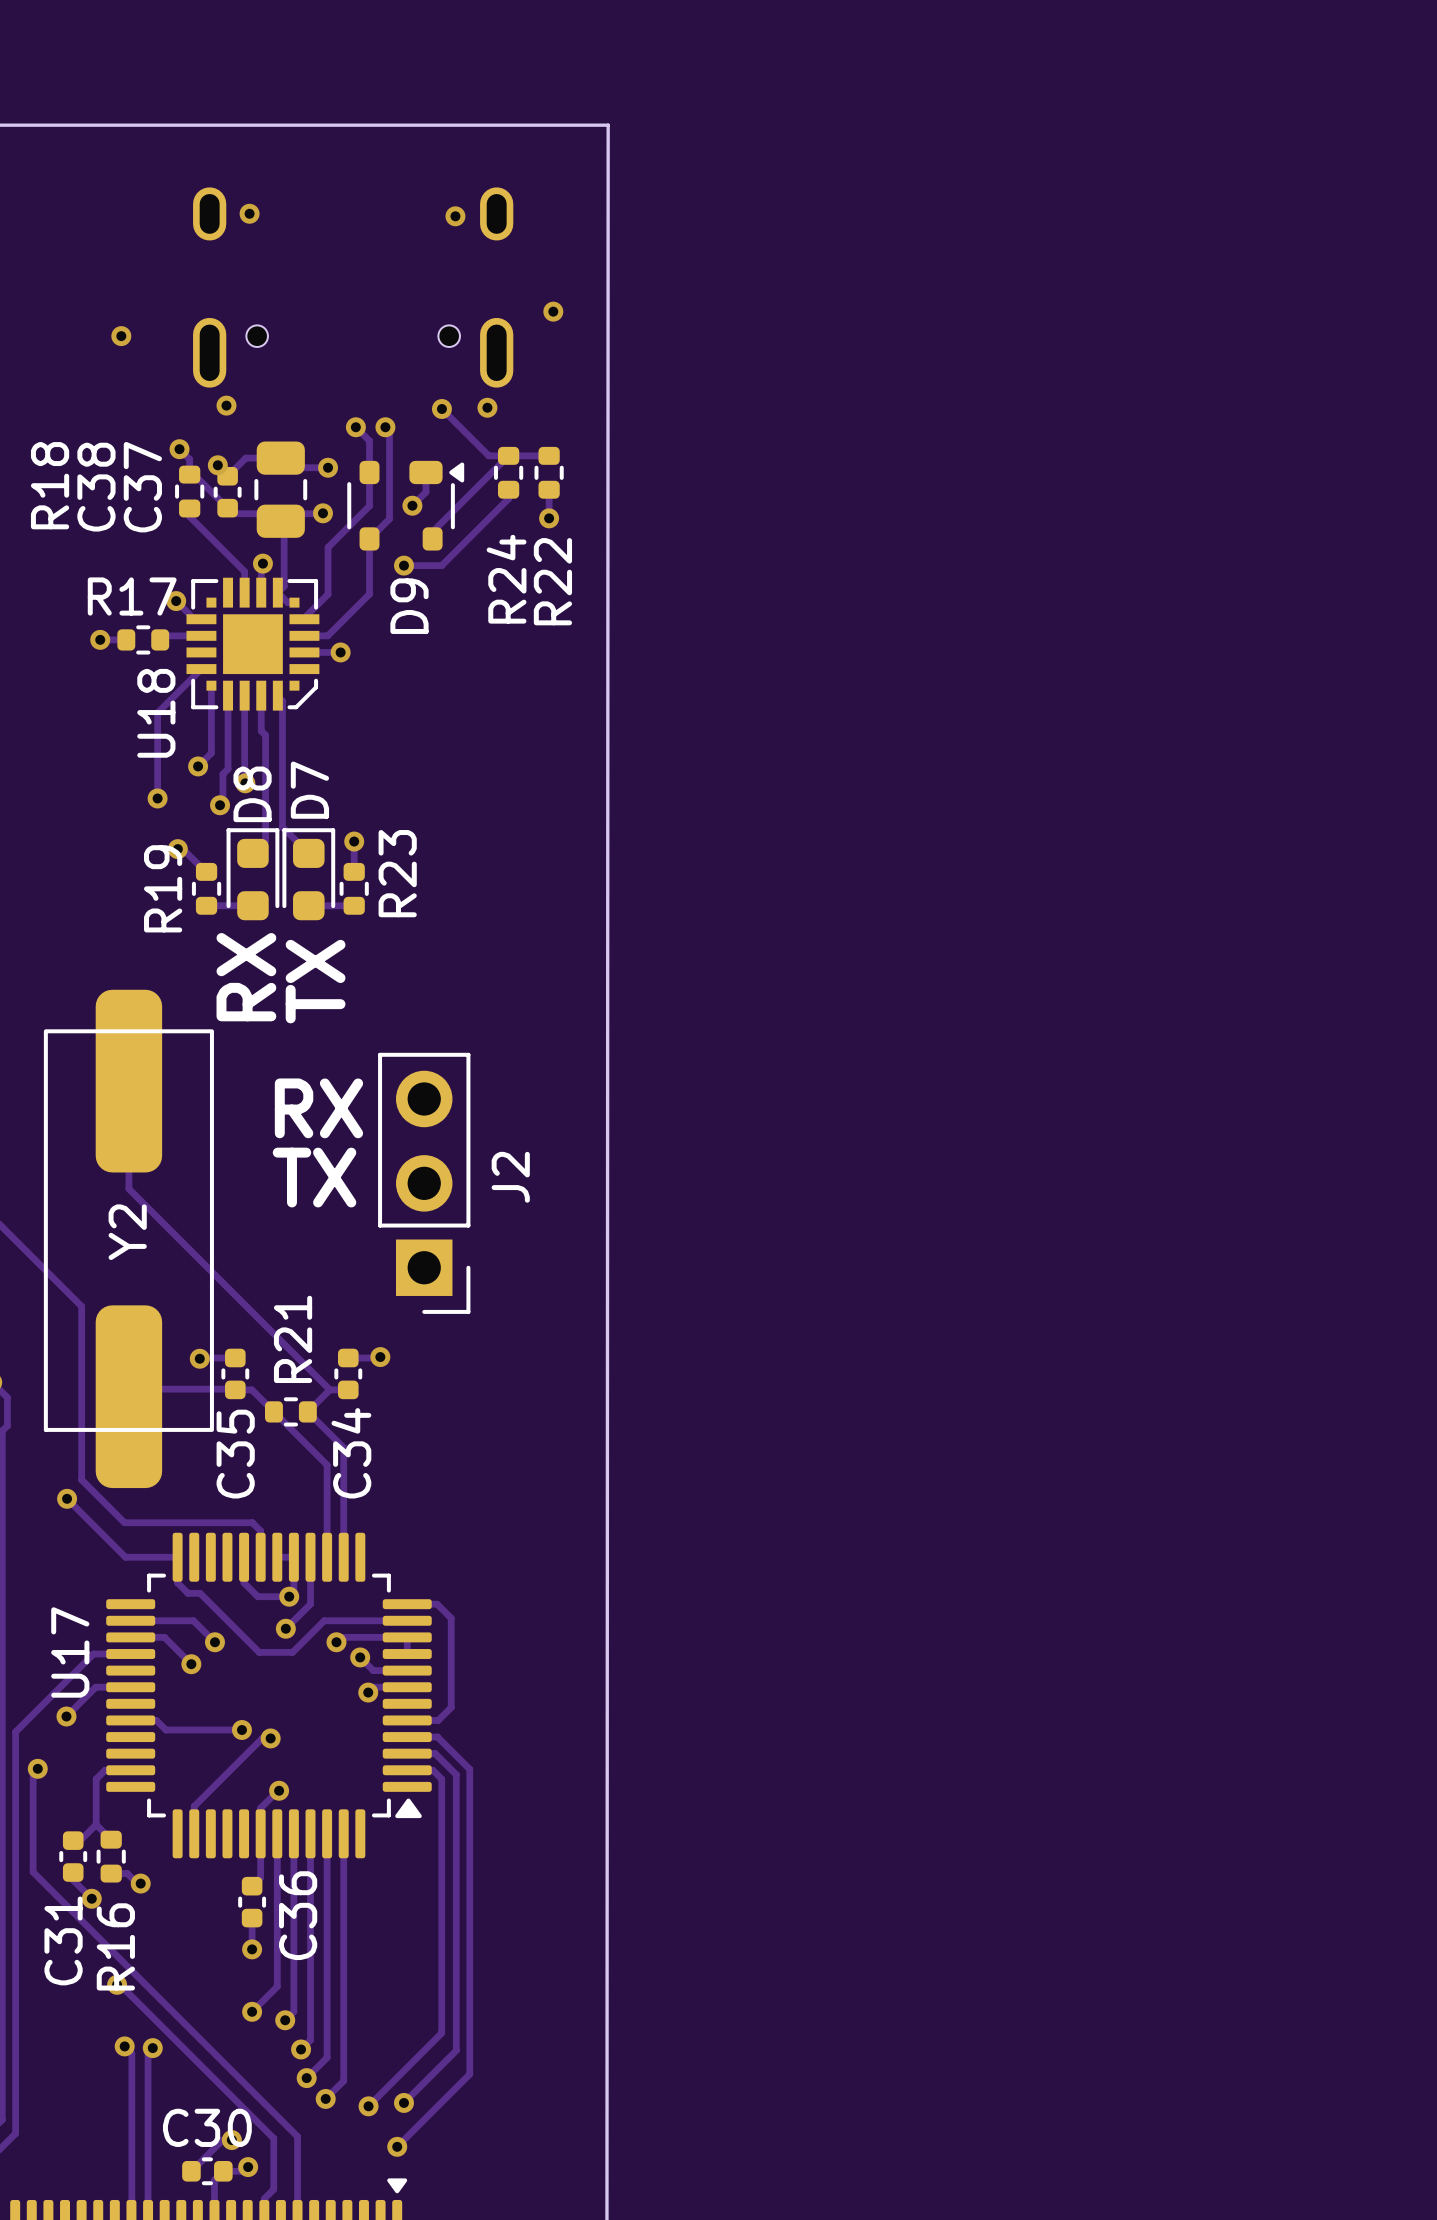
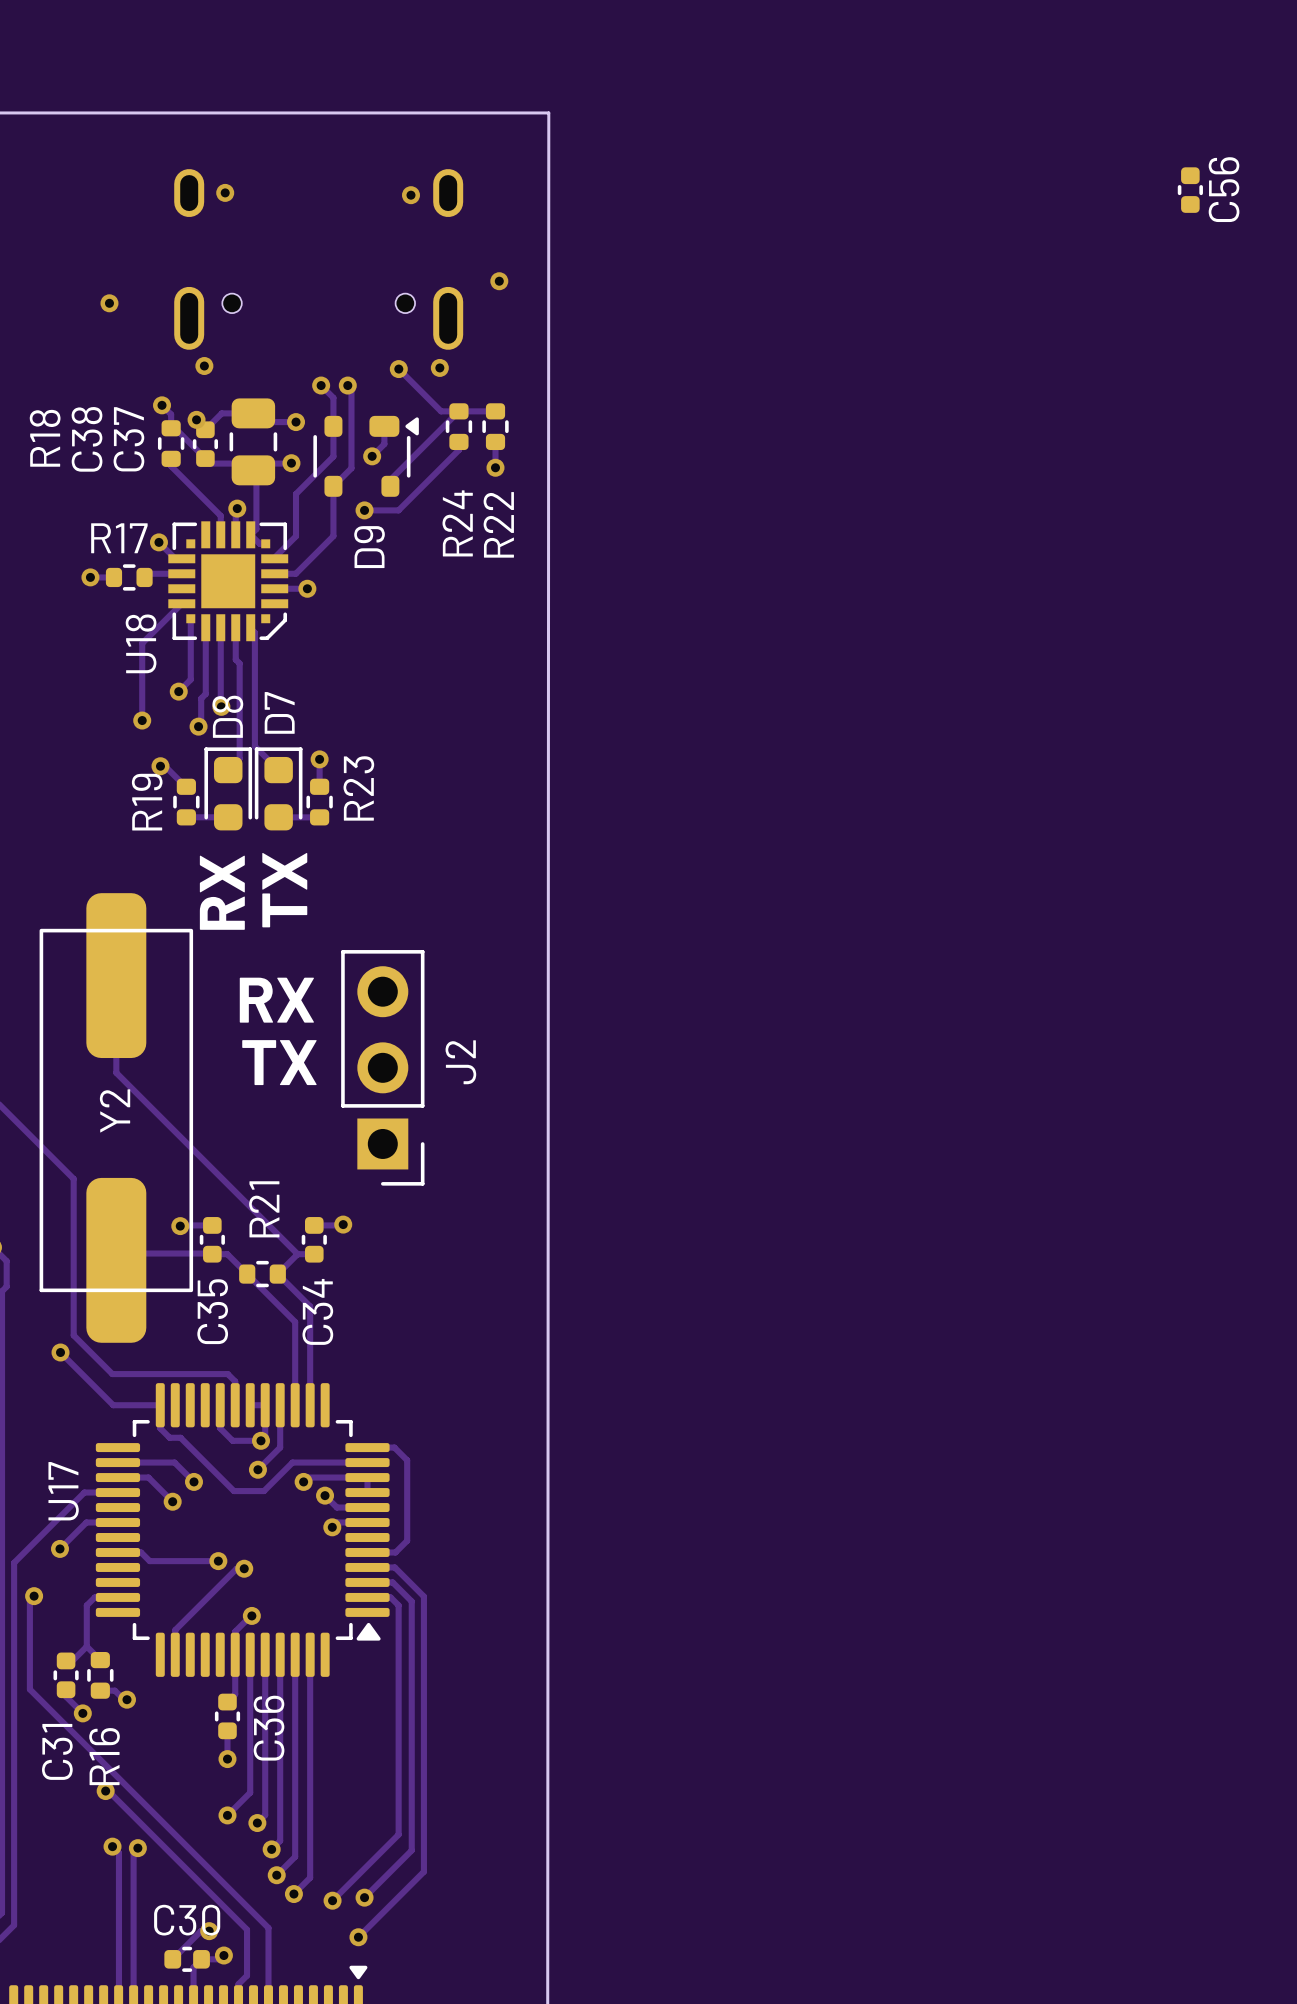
C56: none -> (1190, 190)

